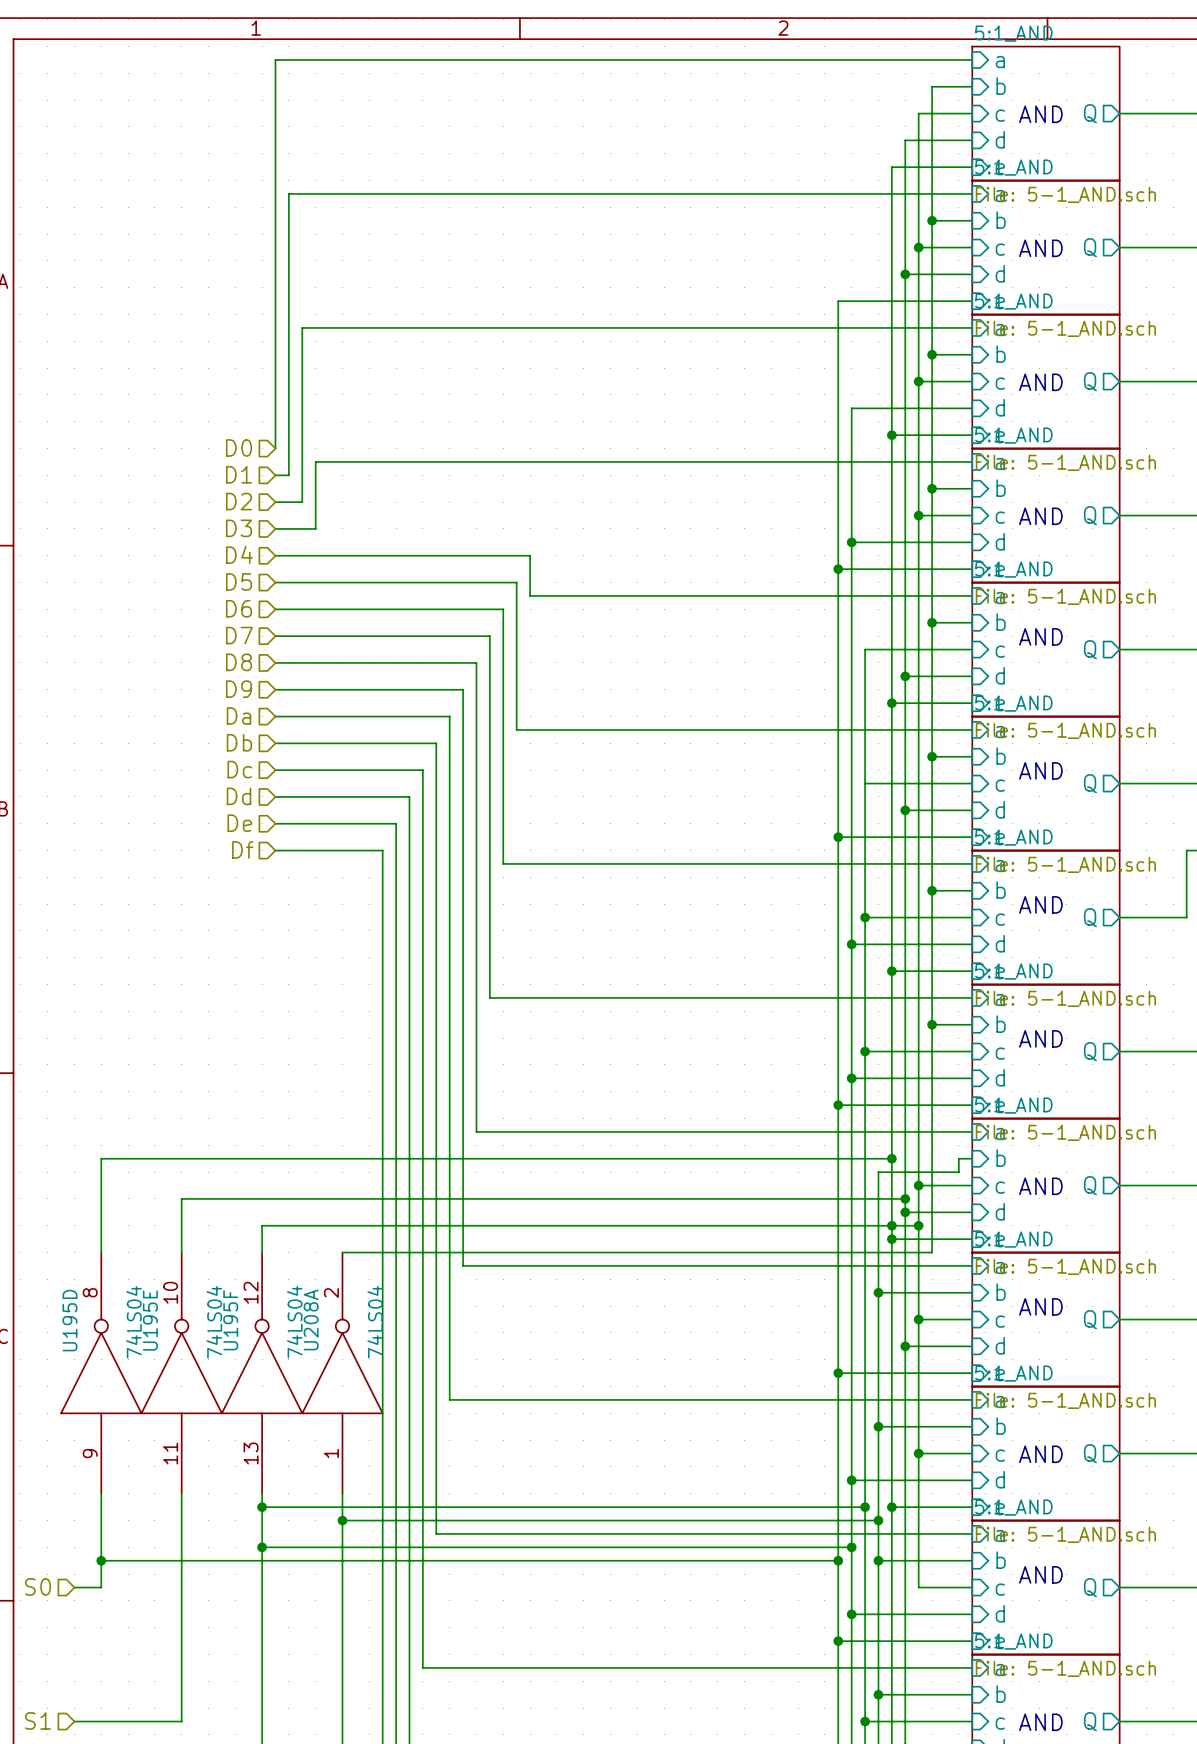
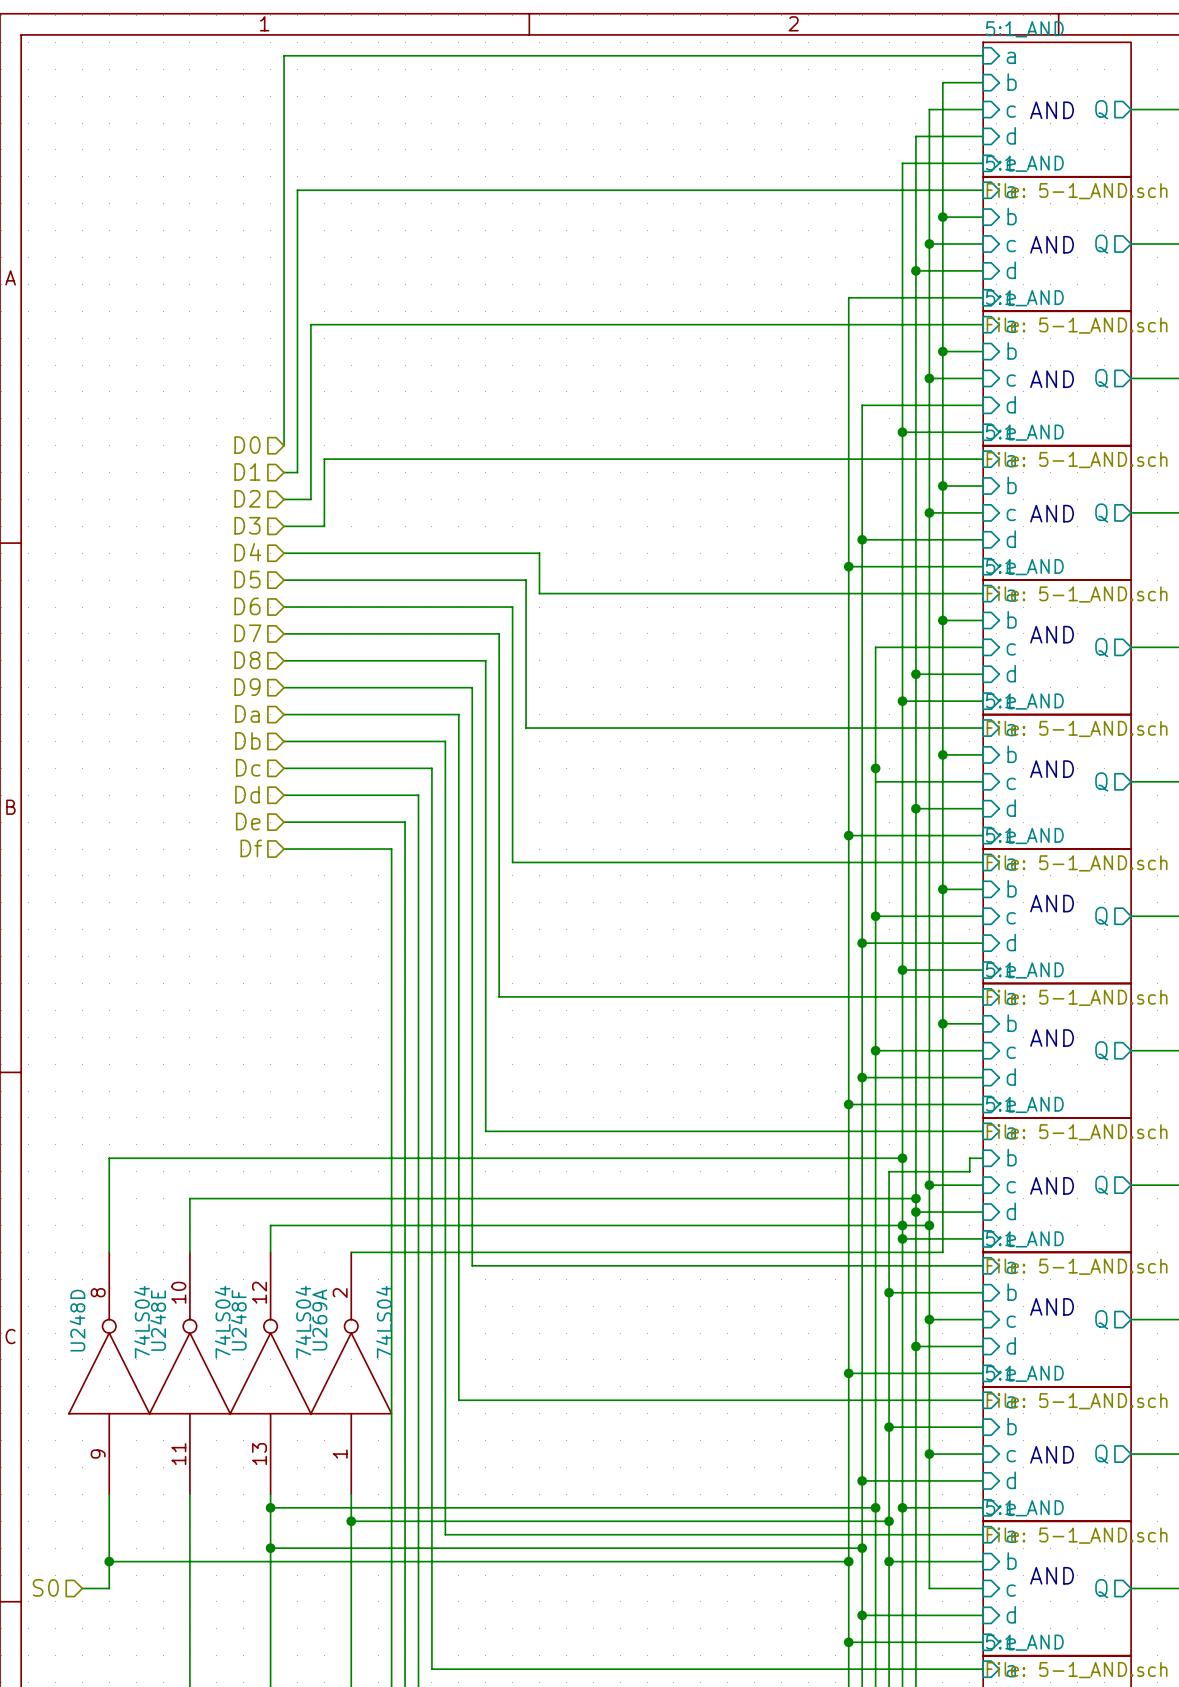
junction: none -> (875, 768)
U208A name: U208A (311, 1319) -> U269A (319, 1319)
U195D name: U195D (69, 1320) -> U248D (77, 1320)
U195E name: U195E (150, 1320) -> U248E (158, 1320)
U195F name: U195F (230, 1320) -> U248F (238, 1320)

